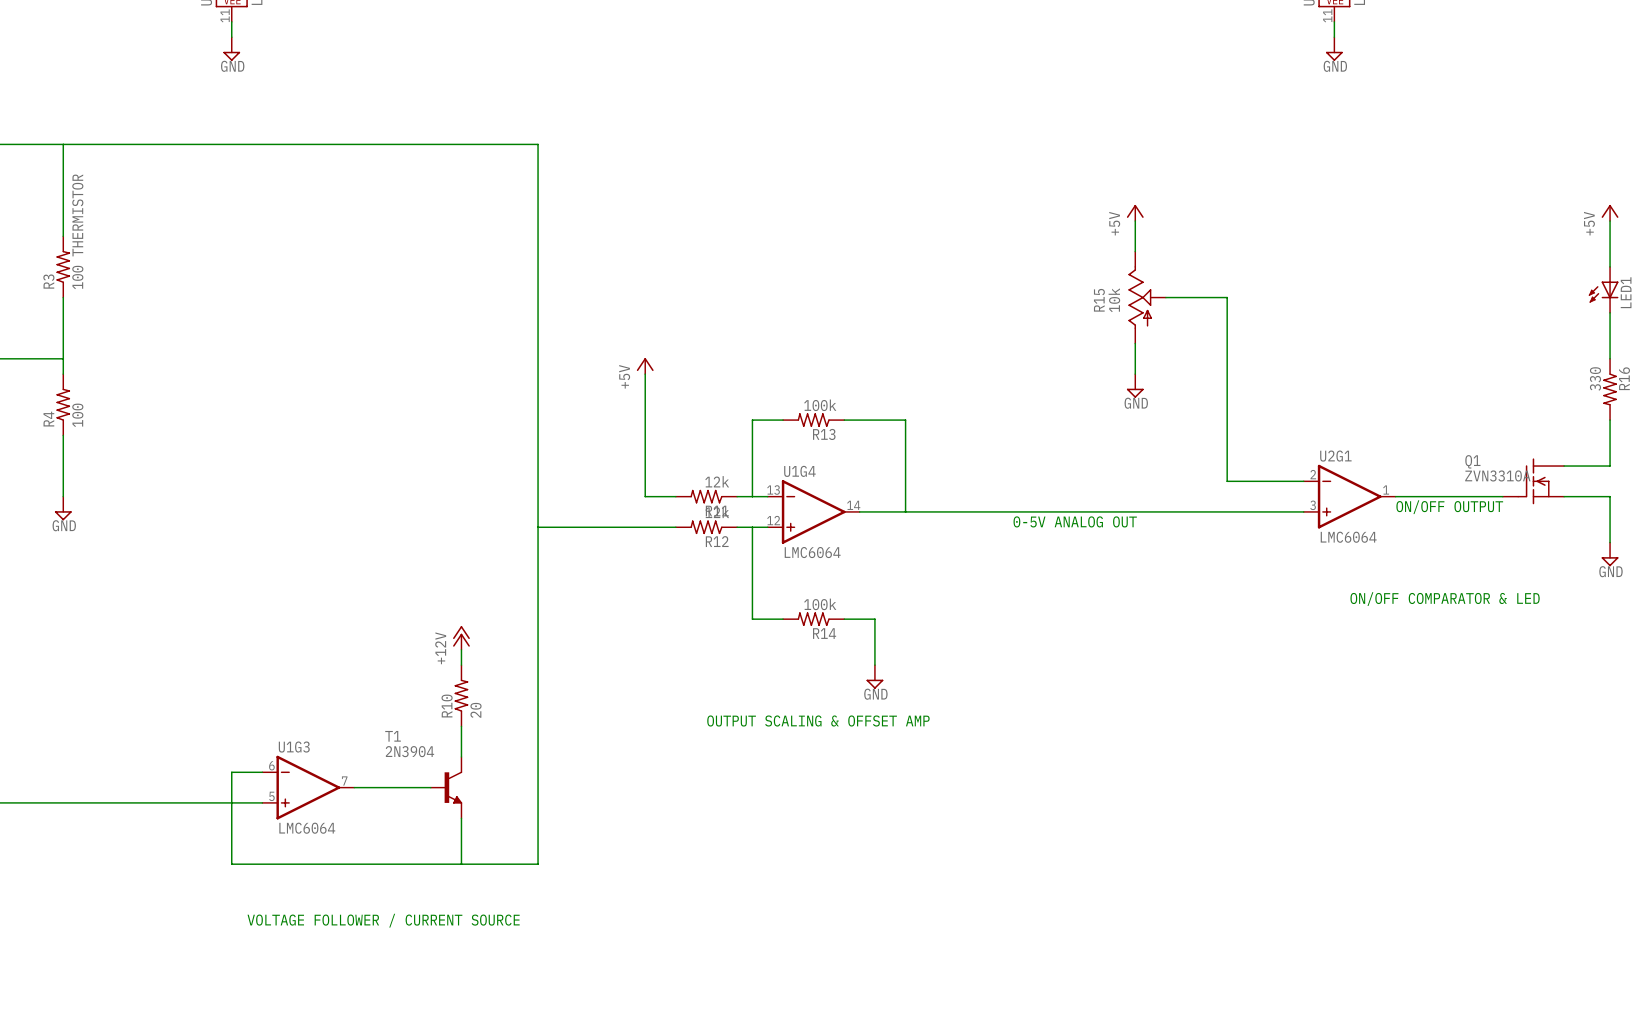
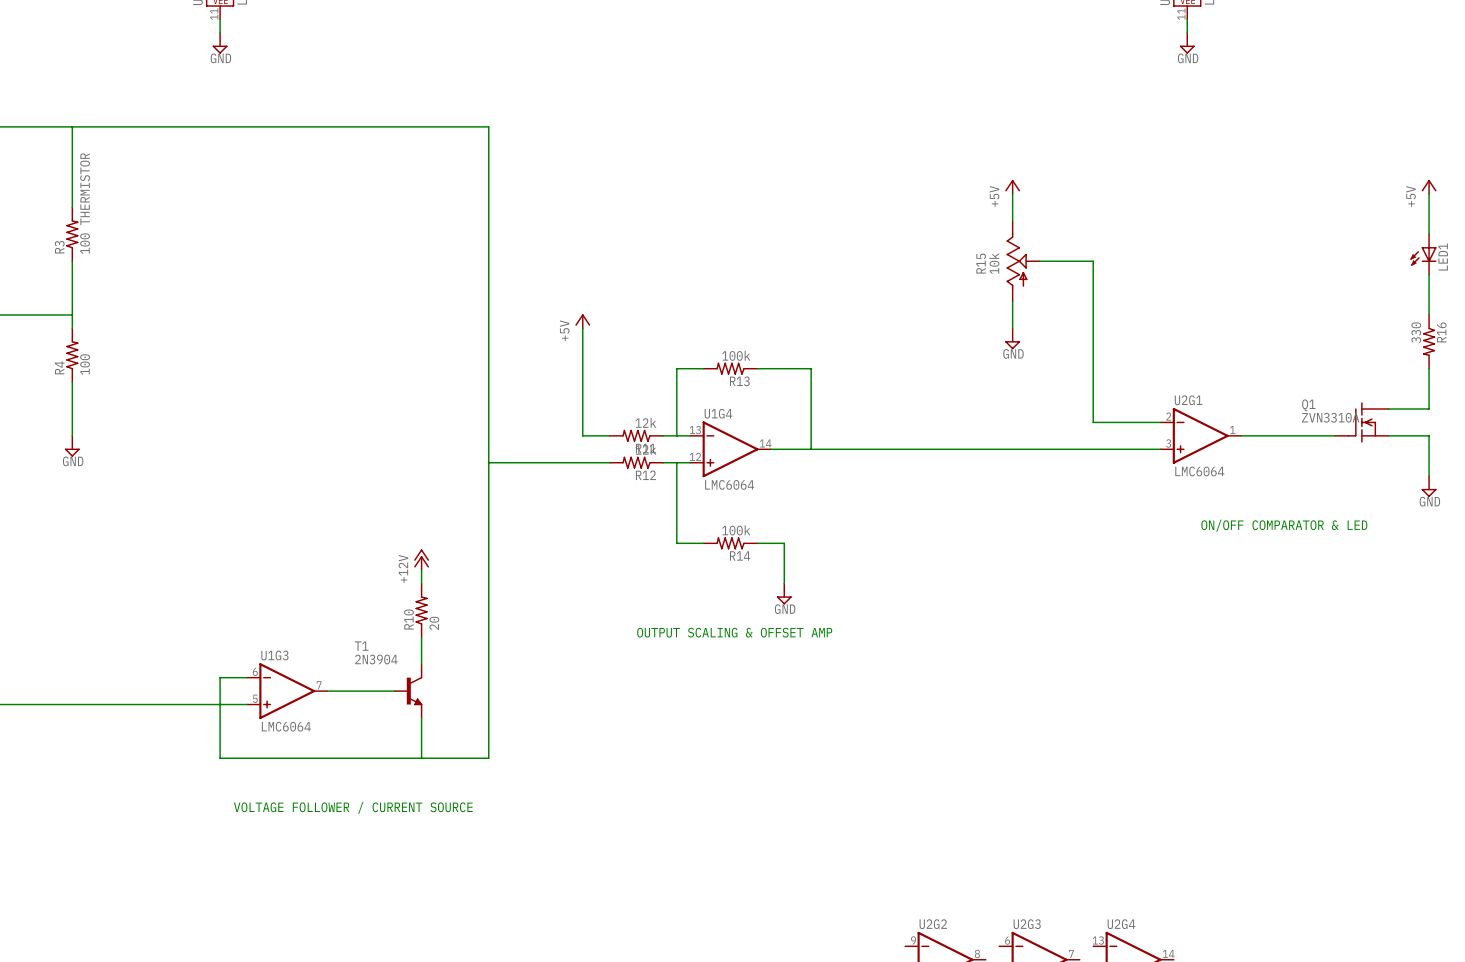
text: ON/OFF OUTPUT (1449, 507) -> none
text: 0-5V ANALOG OUT (1075, 521) -> none

